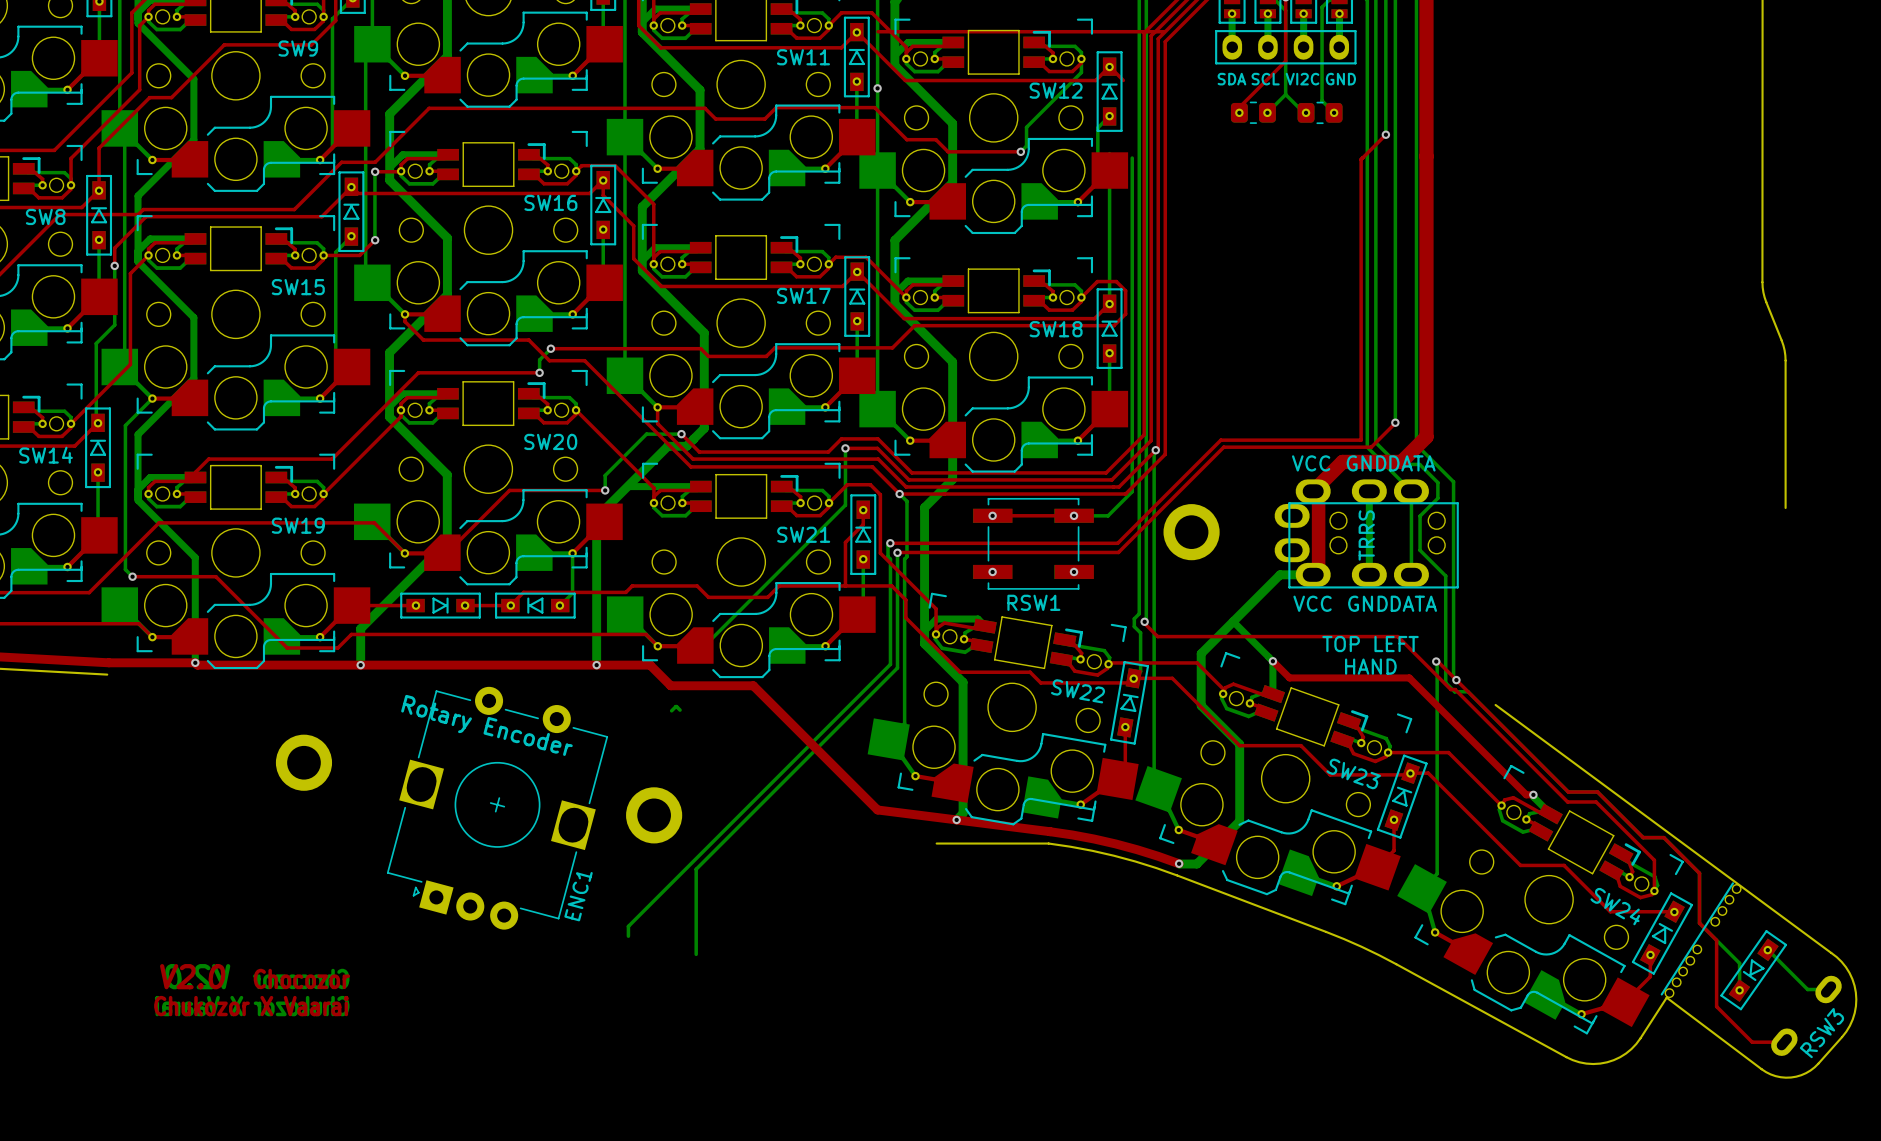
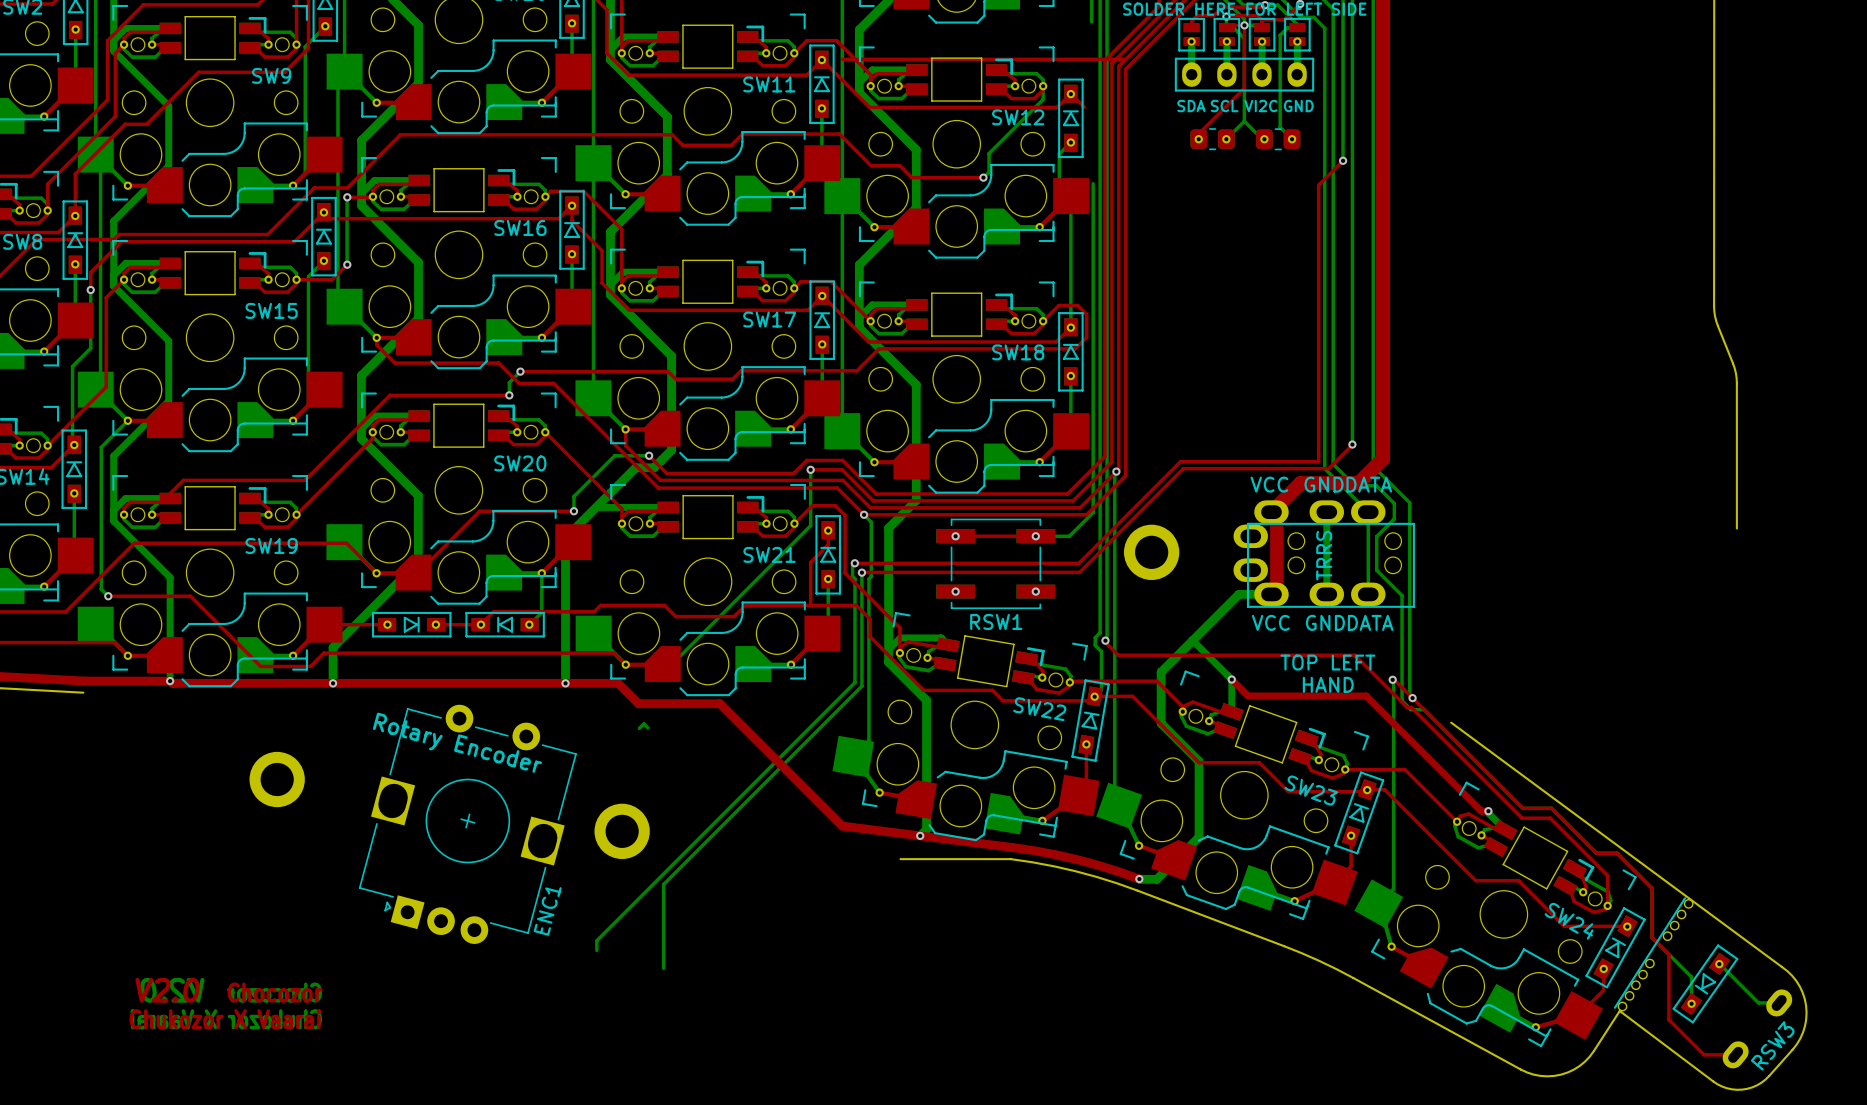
via: (877, 88) -> none

